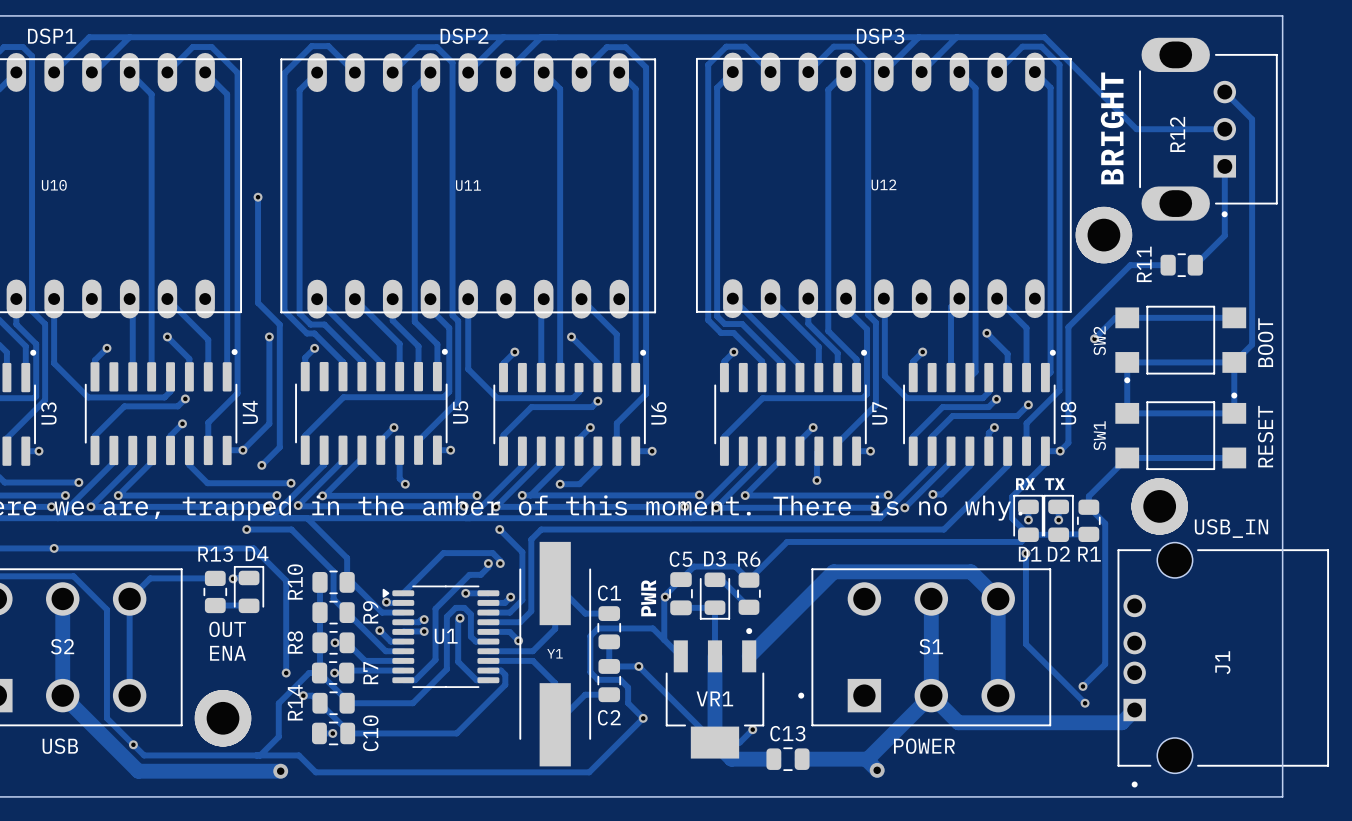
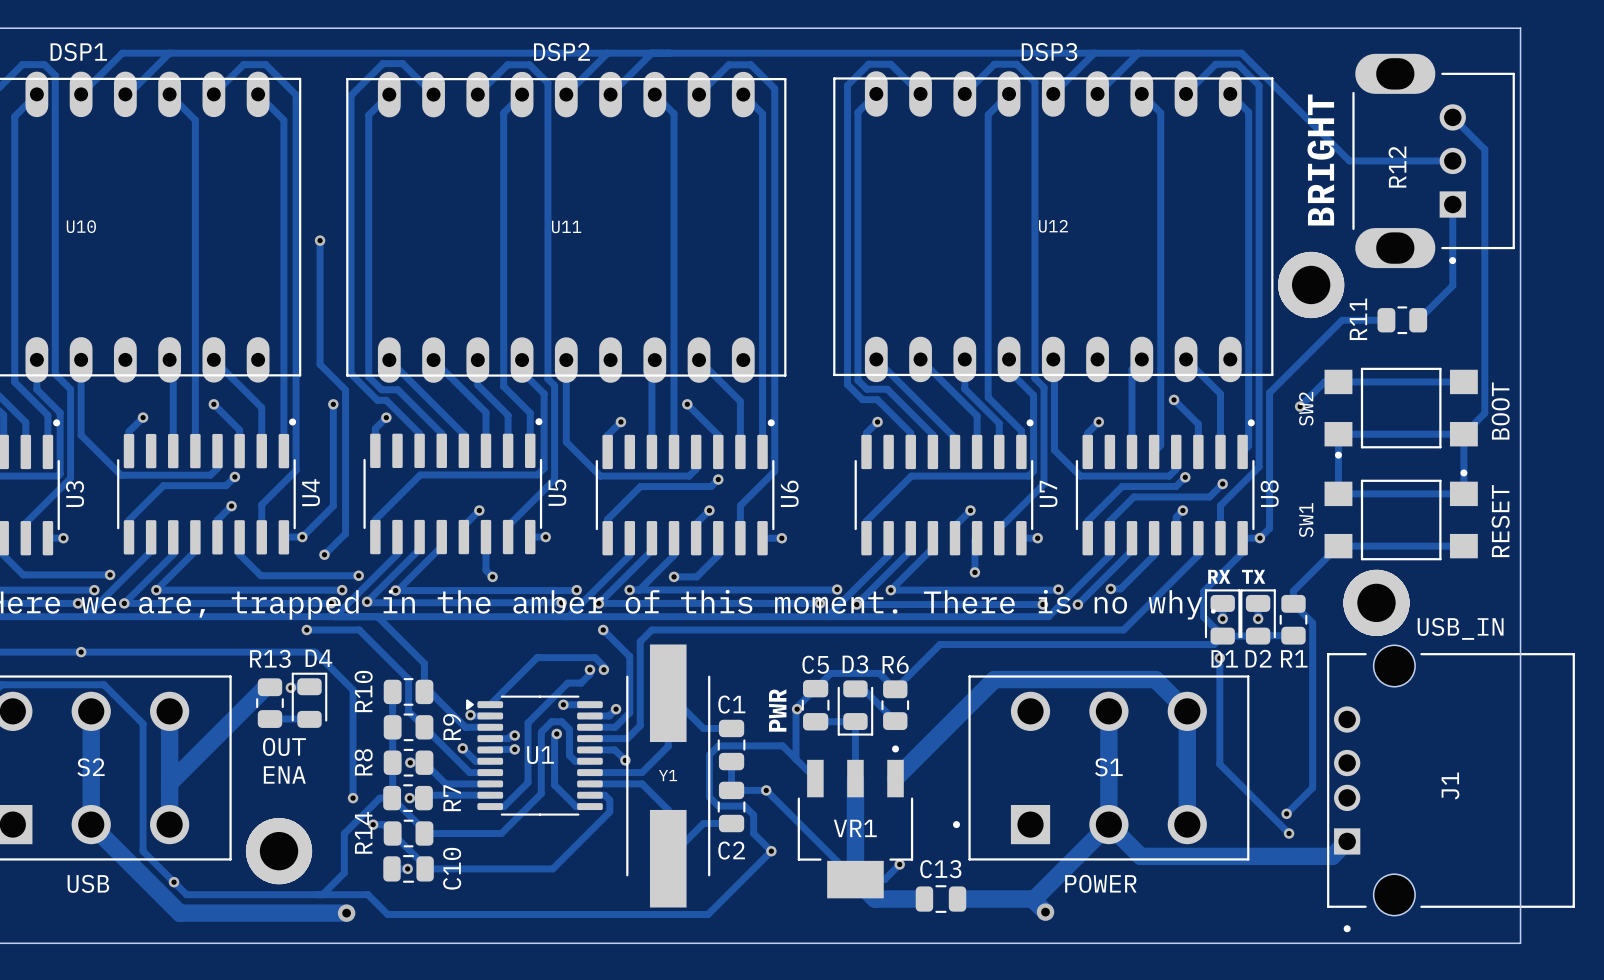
track: (211, 578) (150, 578) (129, 598) -> (265, 687) (169, 783)
track width: thin (129, 598) (129, 695) -> thick (169, 711) (169, 824)

